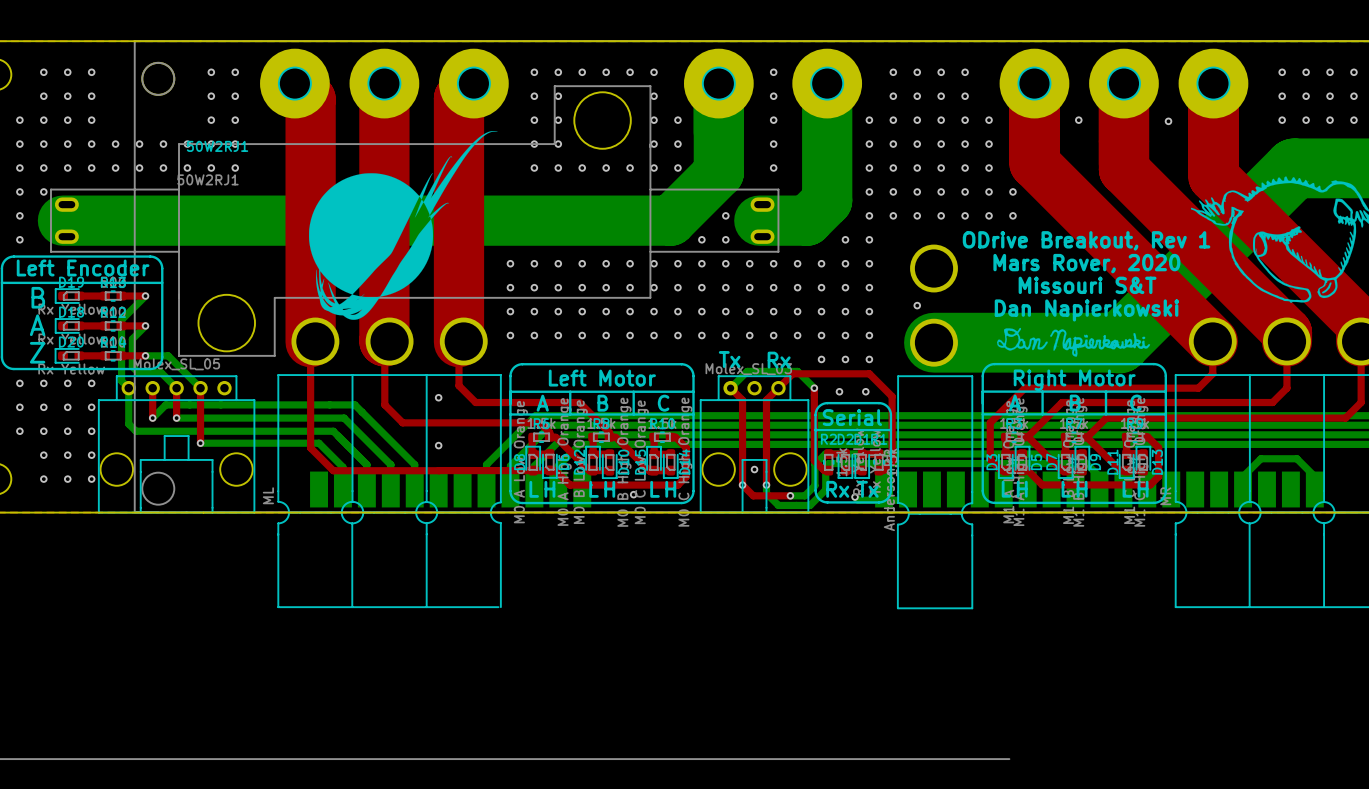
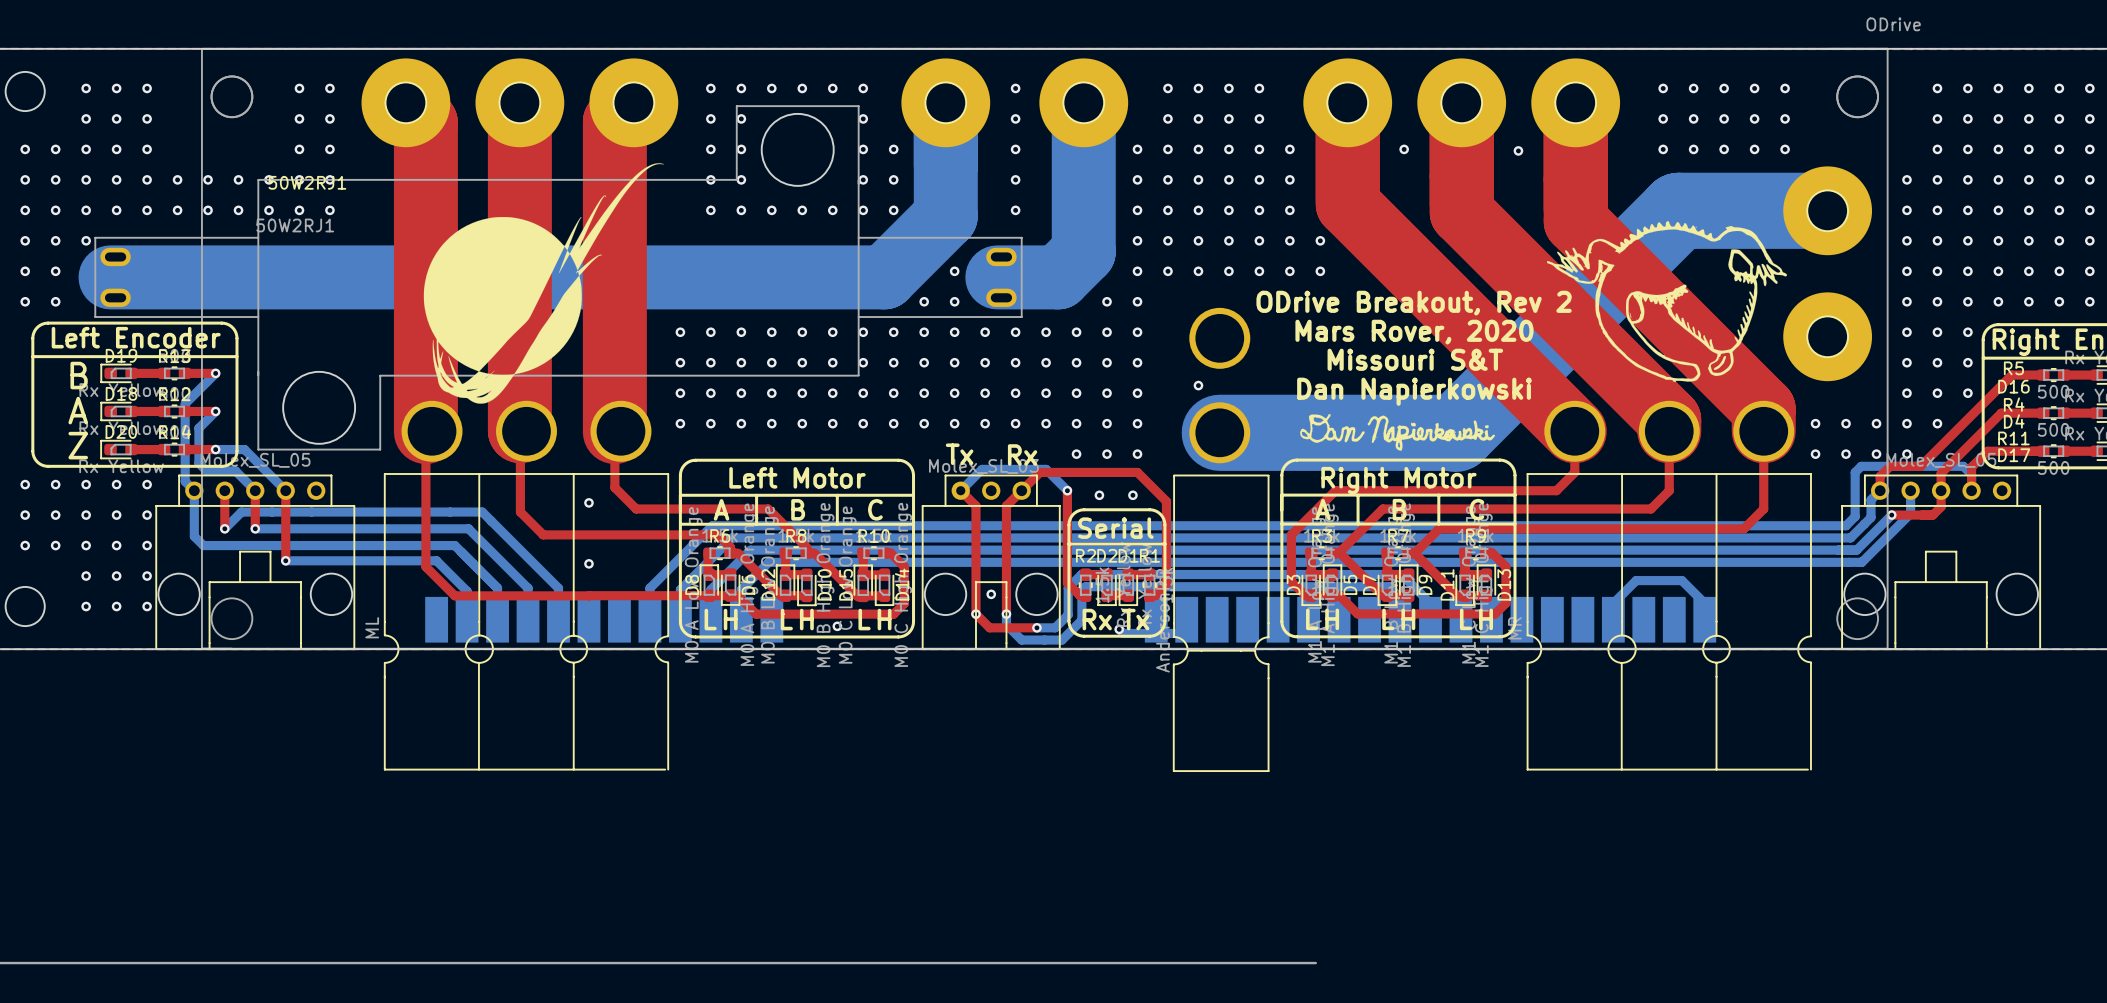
text: ODrive Breakout, Rev 1 (1086, 240) -> ODrive Breakout, Rev 2 (1414, 303)

